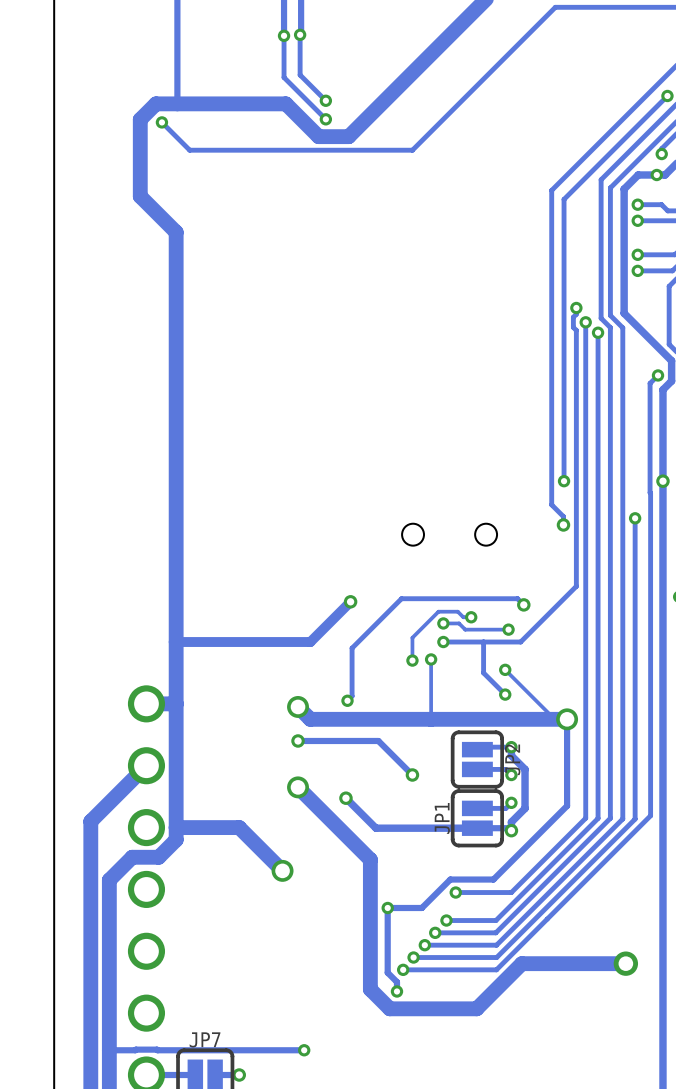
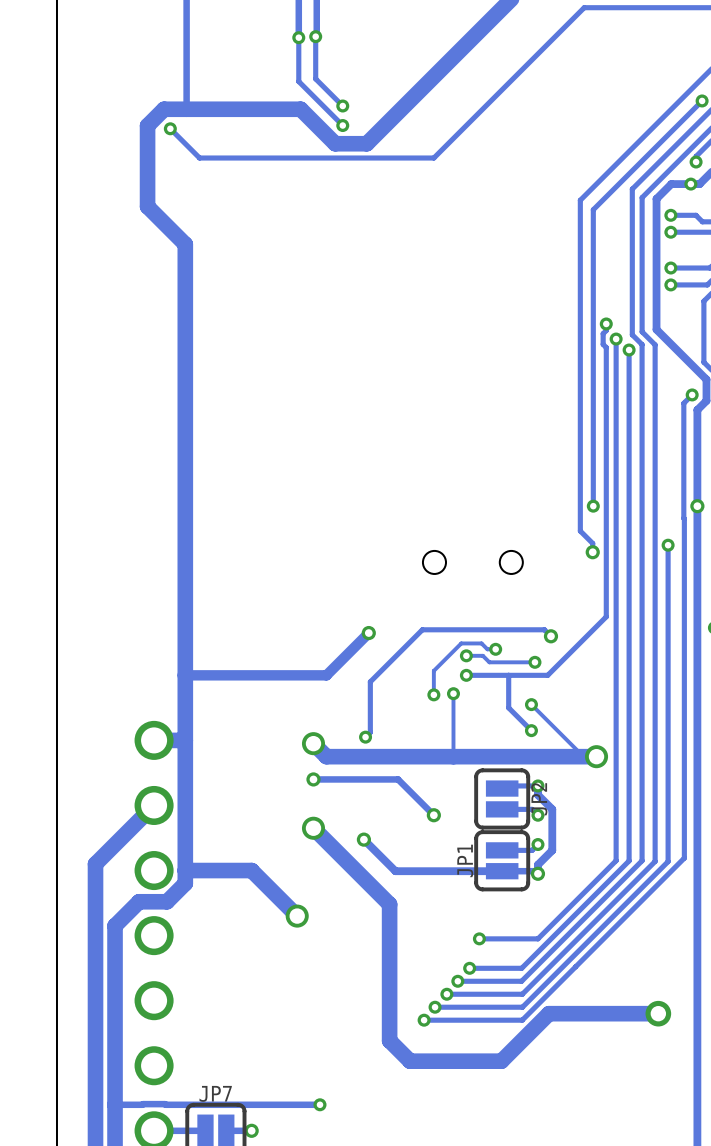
track: (567, 719) (567, 805) (493, 879) (450, 879) (421, 907) (387, 907) (387, 972) (396, 982) (396, 991) -> none
via: (387, 907) -> none
via: (396, 991) -> none

